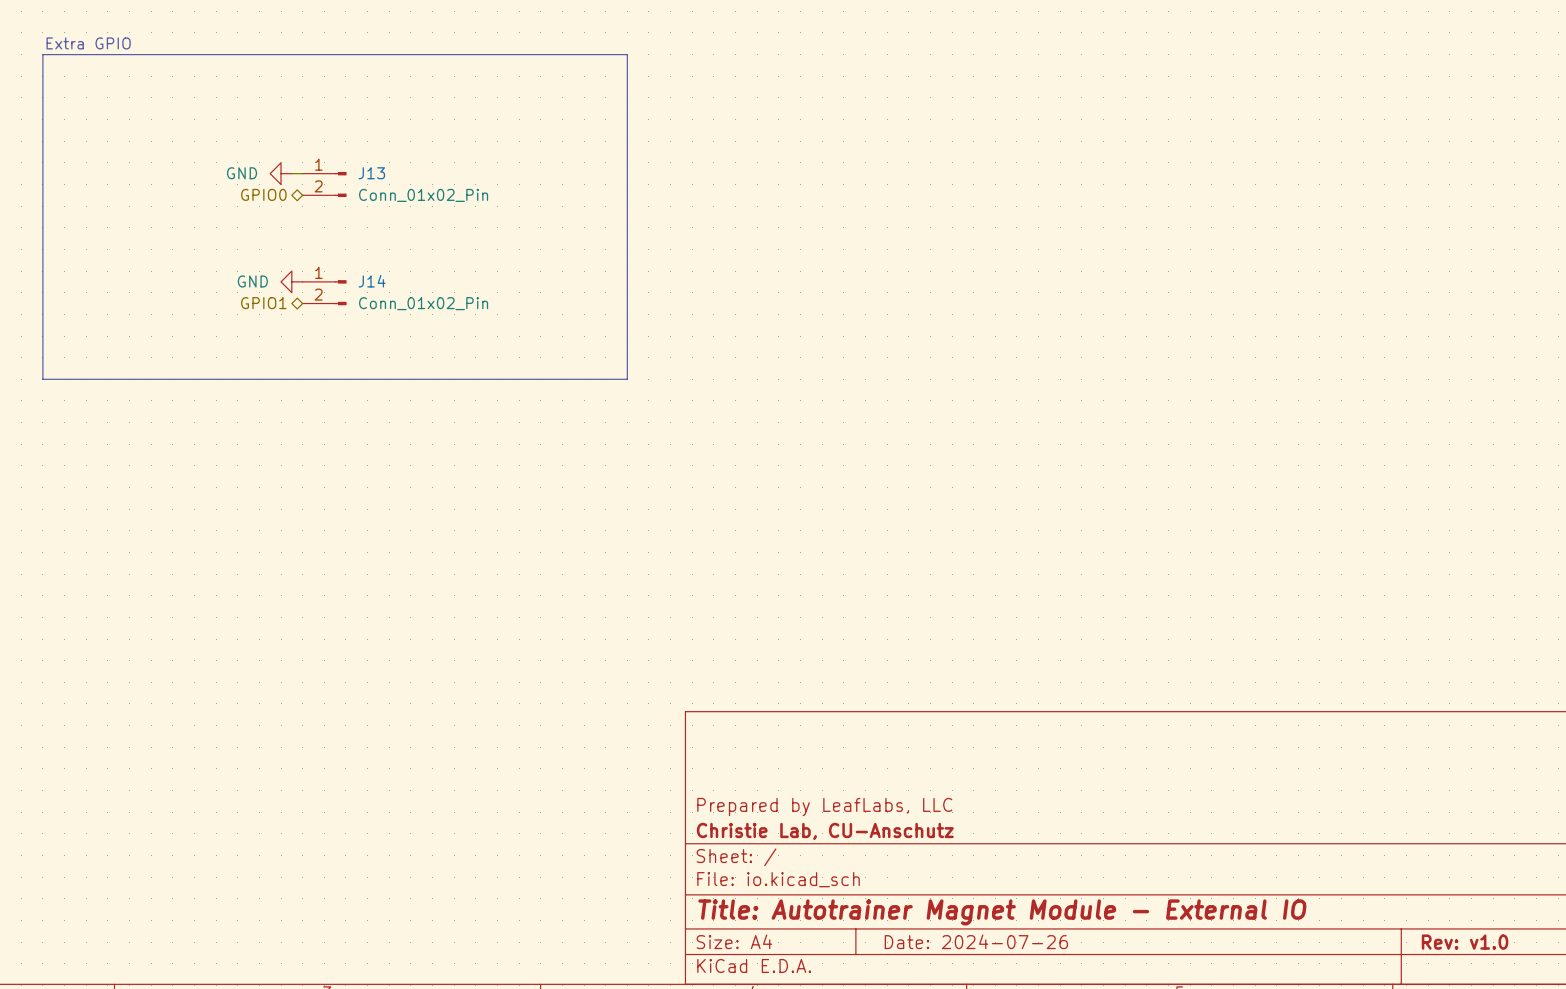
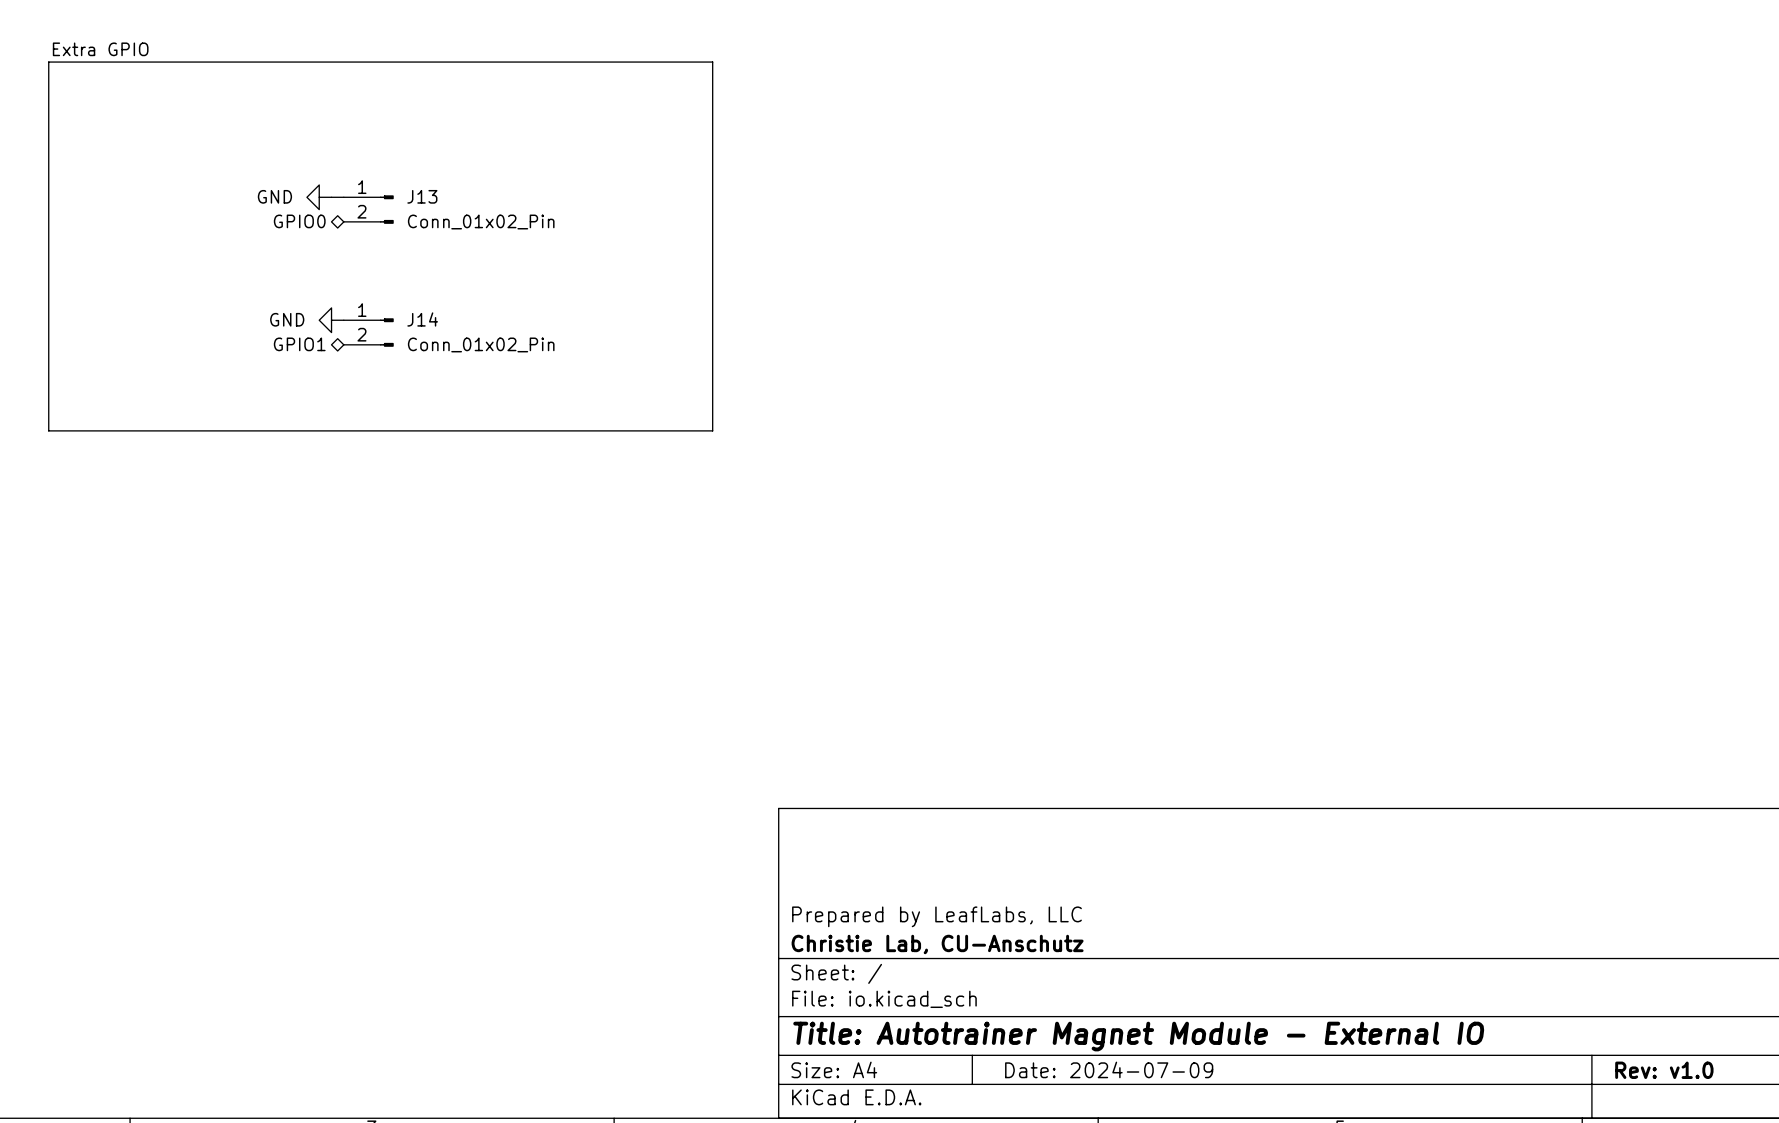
title block: Date: 2024-07-26 (976, 941) -> Date: 2024-07-09 (1109, 1069)

